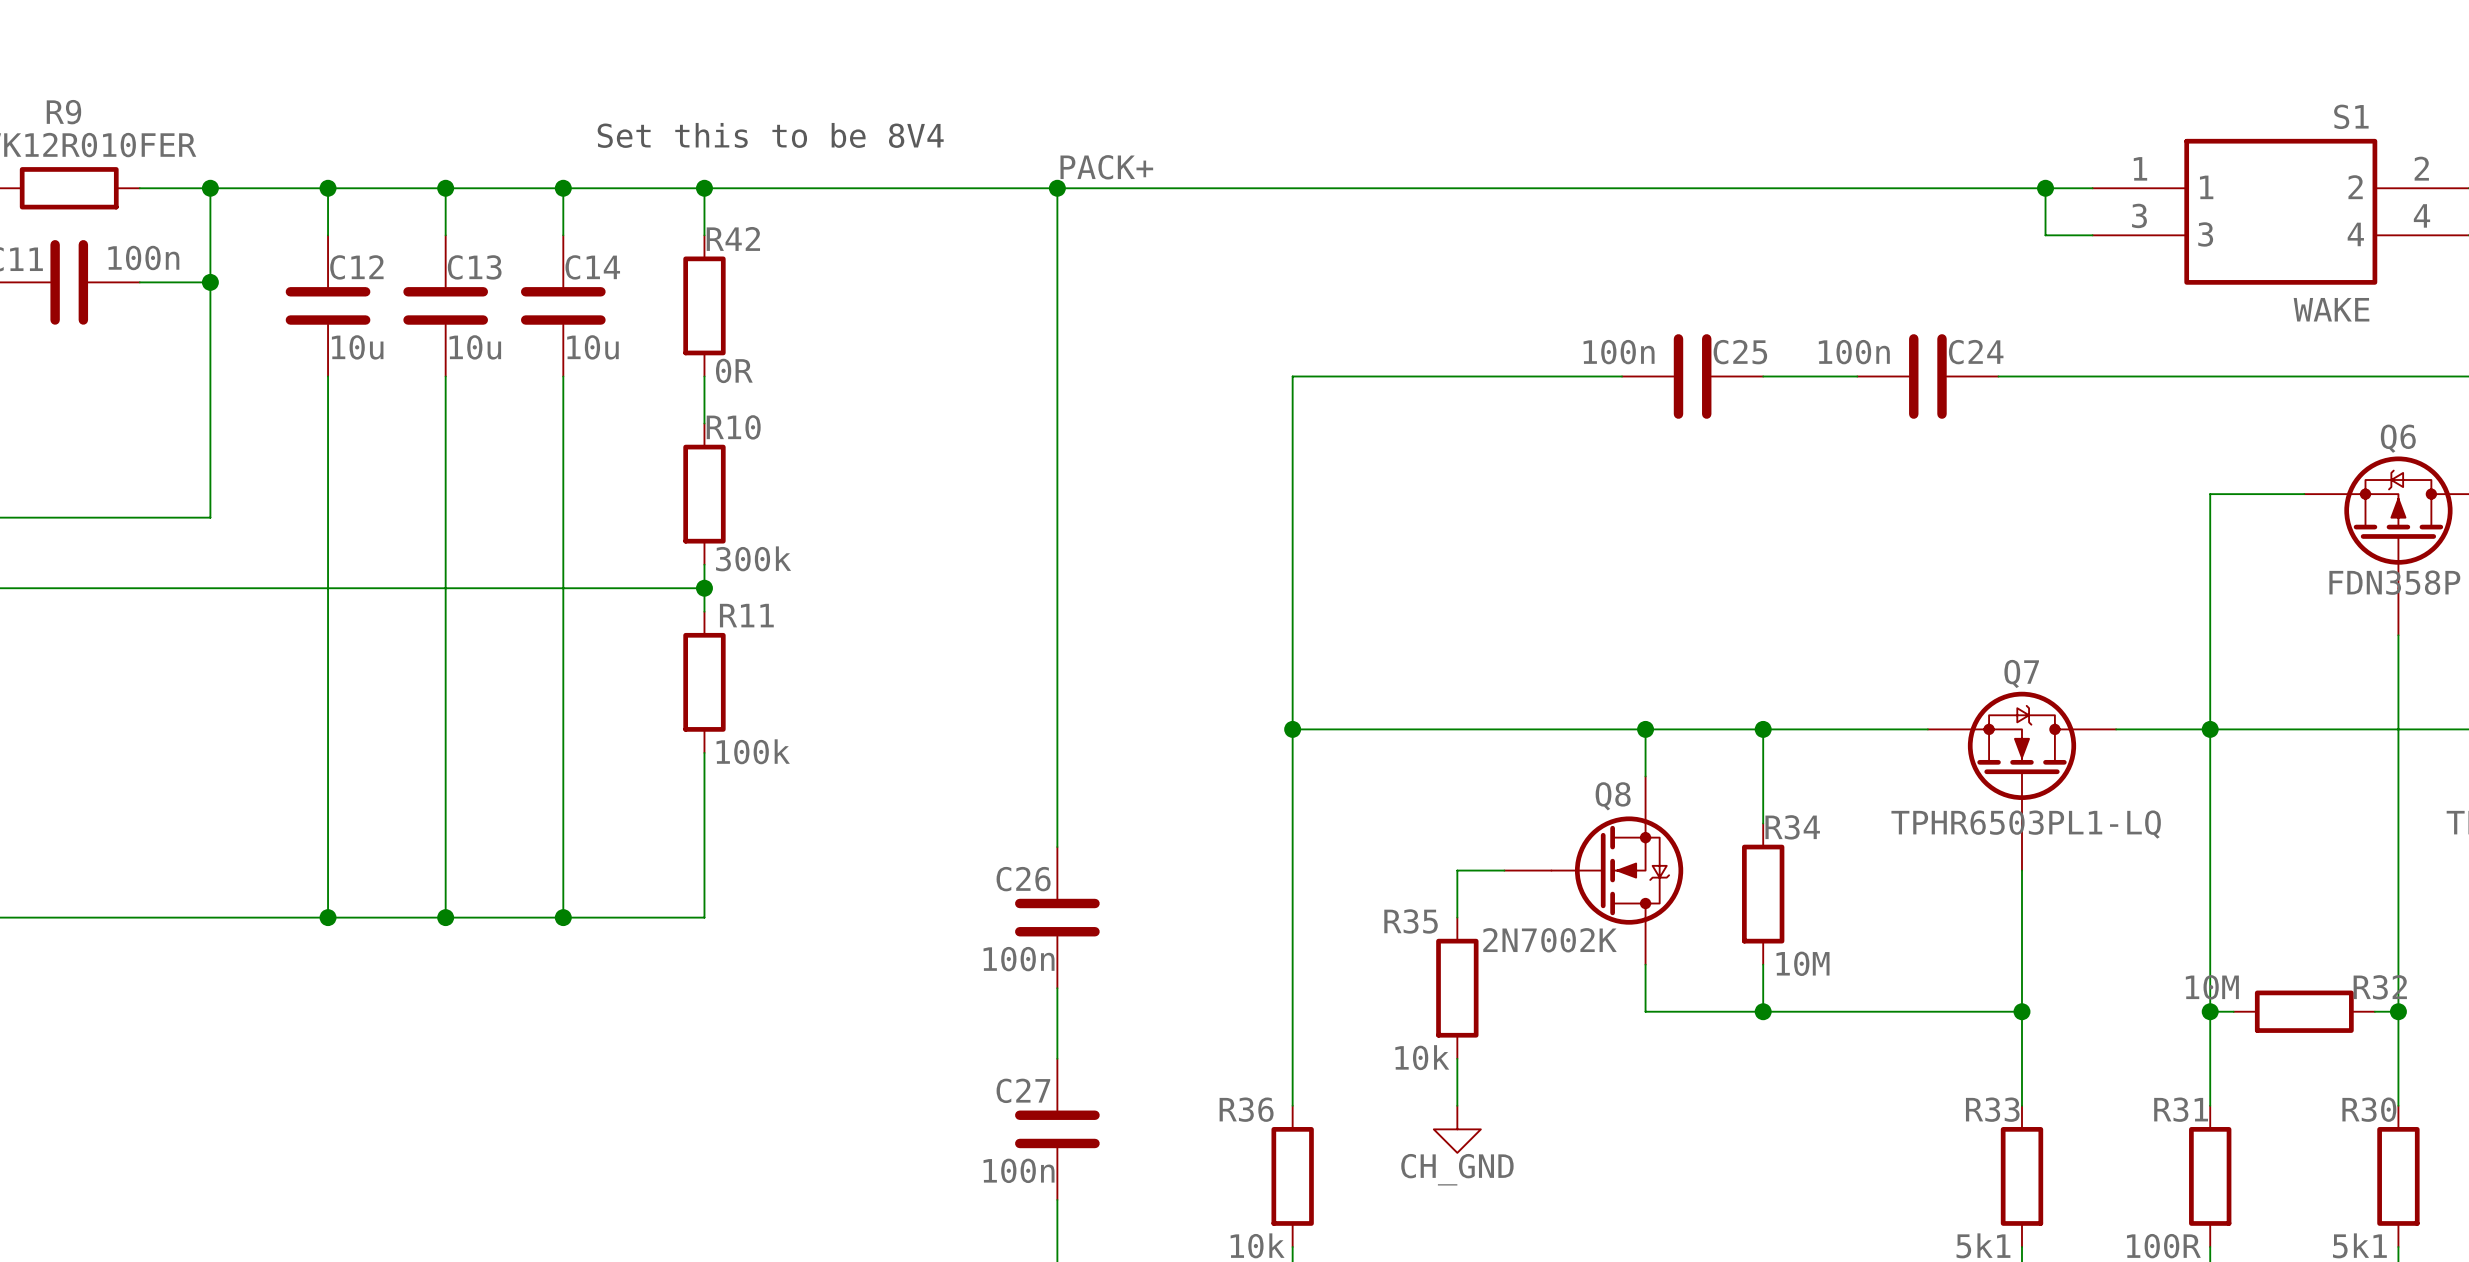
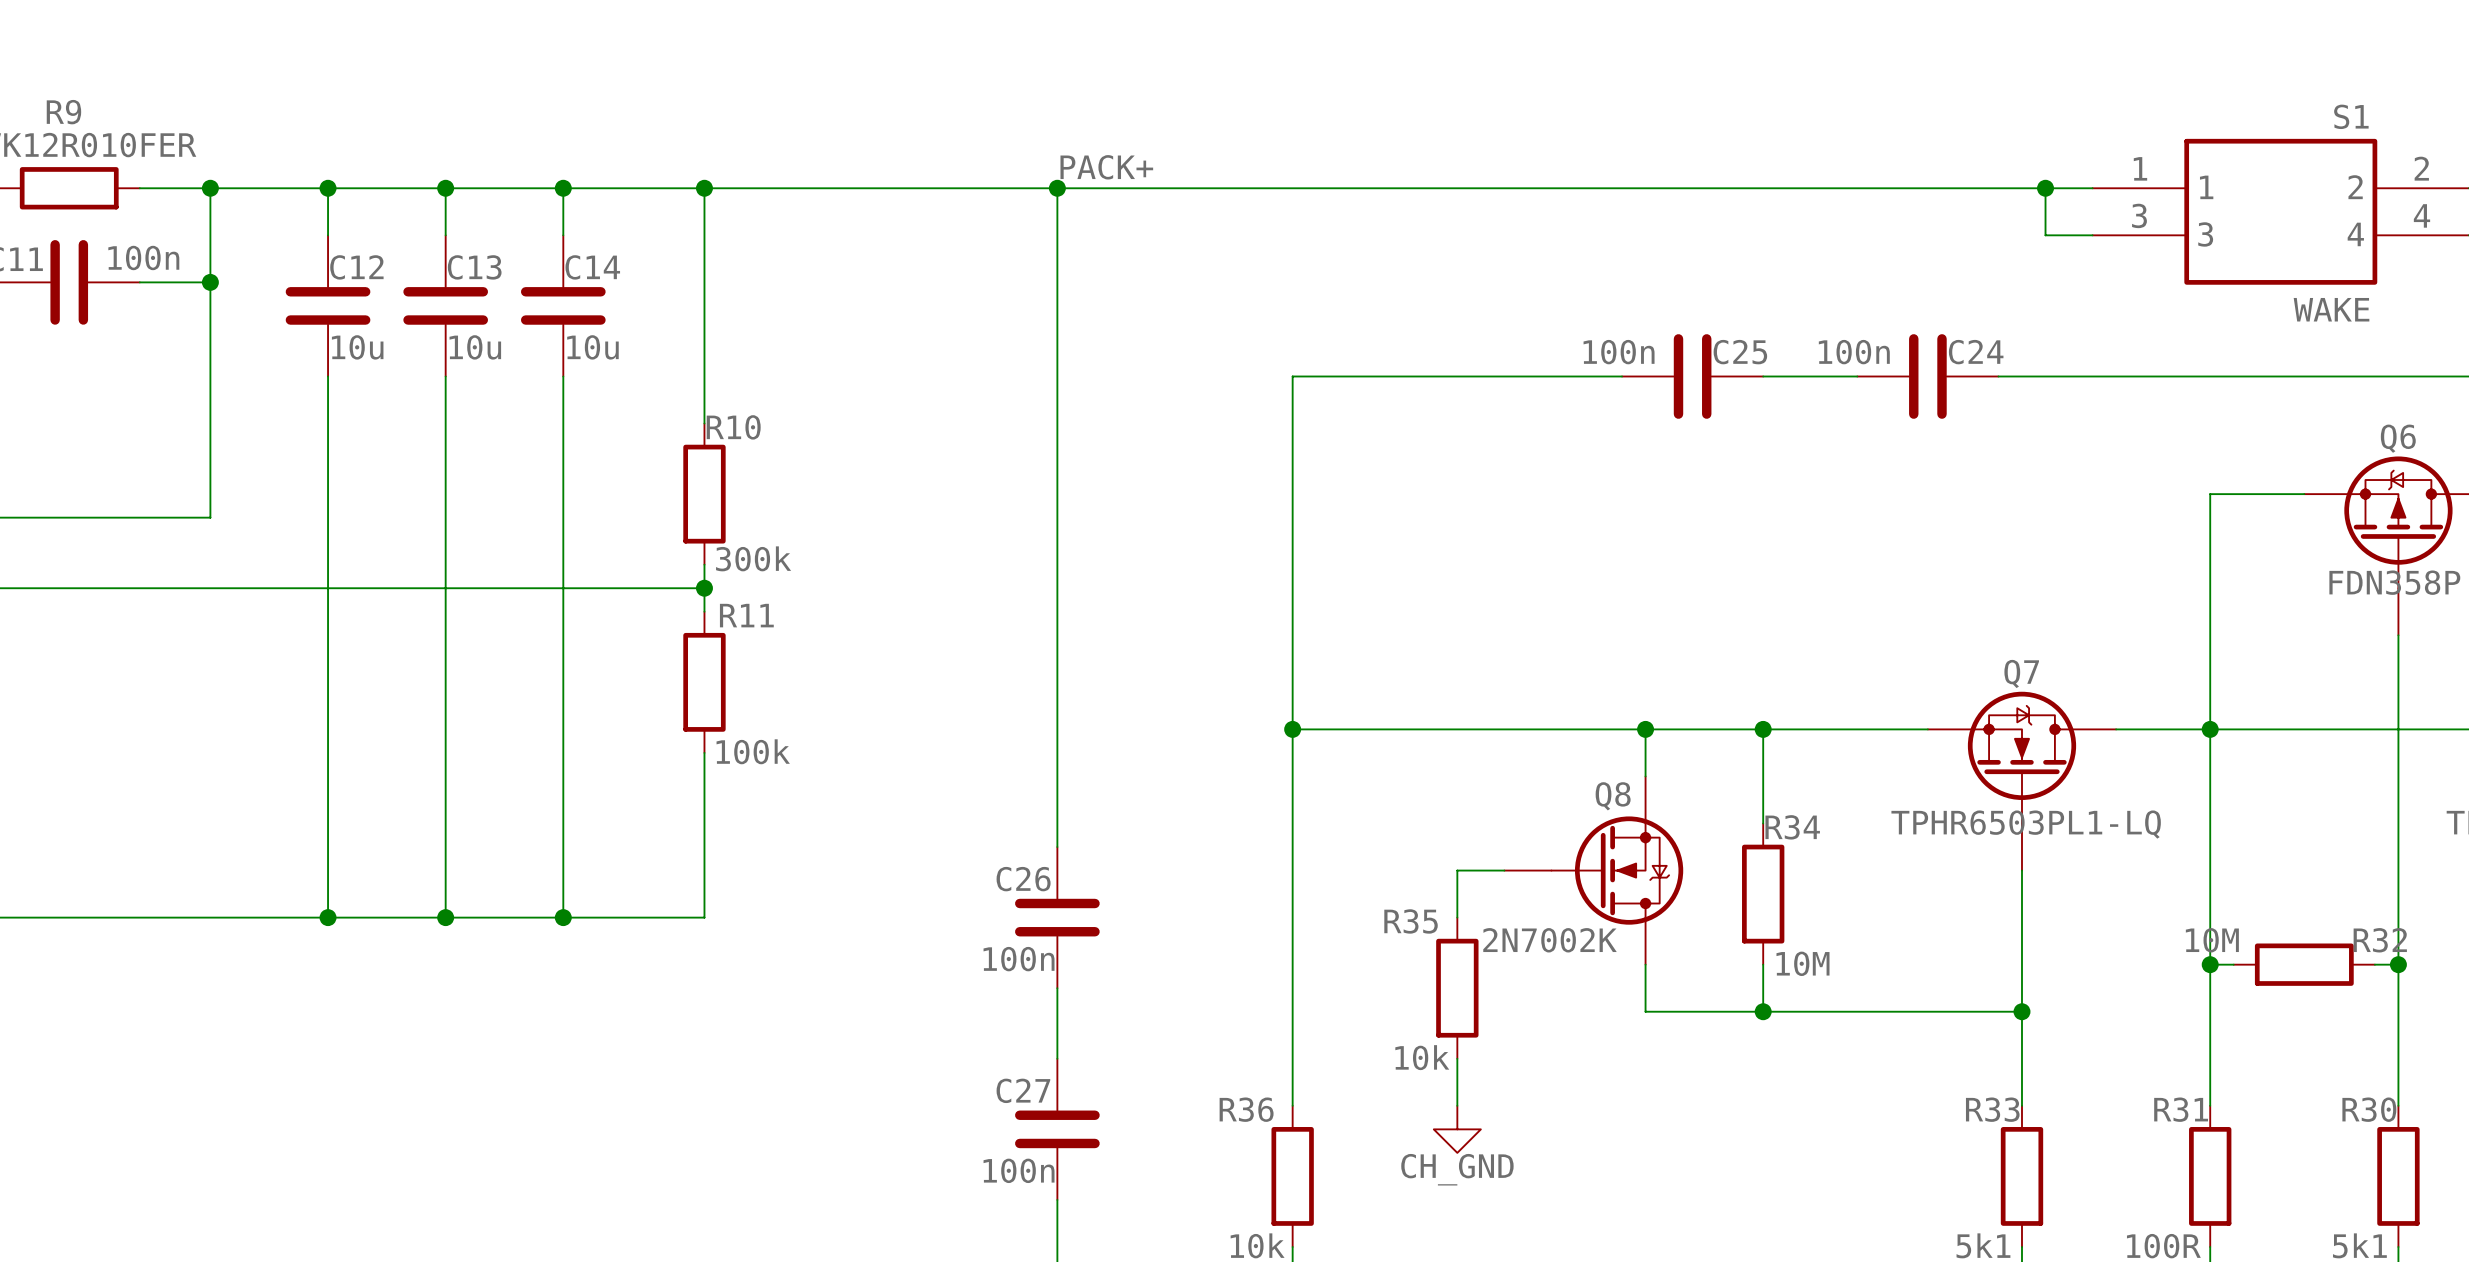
text: Set this to be 8V4 (770, 135) -> none
wire: none -> (704, 235) (704, 376)
R42: 0R (704, 305) -> none
wire: (2210, 1011) (2233, 1011) -> (2210, 964) (2233, 964)
junction position: (2210, 1011) -> (2210, 964)
R32 position: (2304, 1011) -> (2304, 964)
wire: (2374, 1011) (2398, 1011) -> (2374, 964) (2398, 964)
junction position: (2398, 1011) -> (2398, 964)

